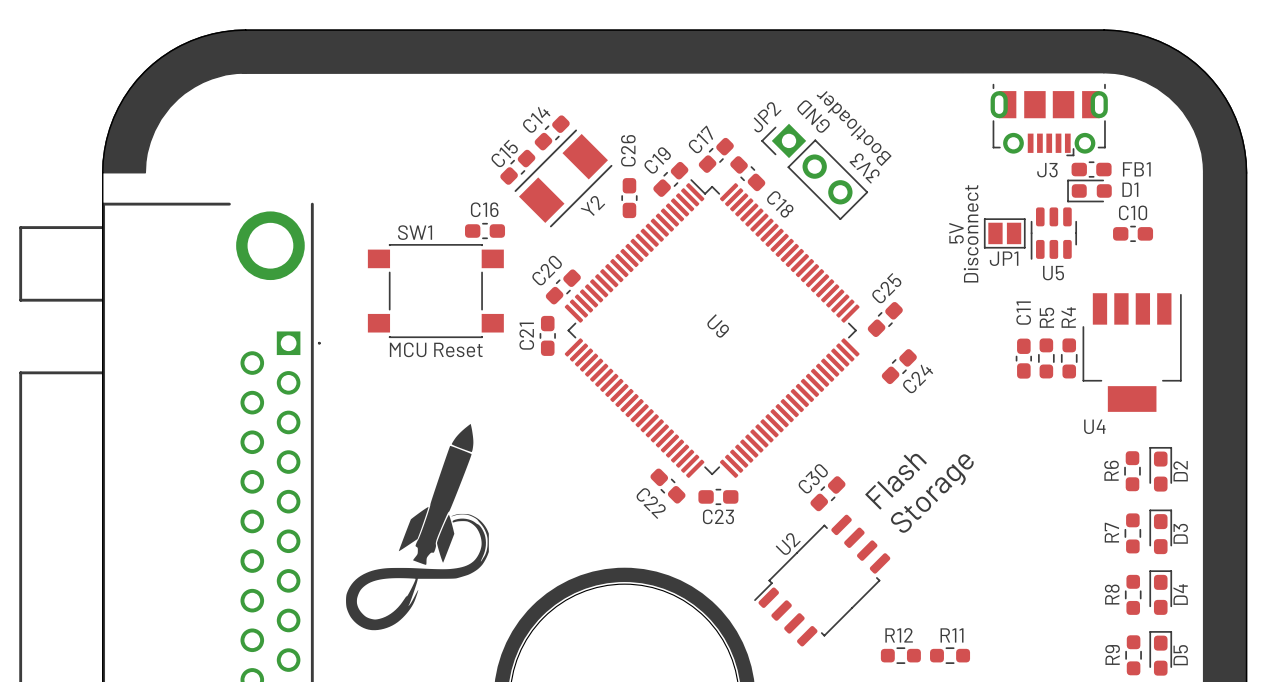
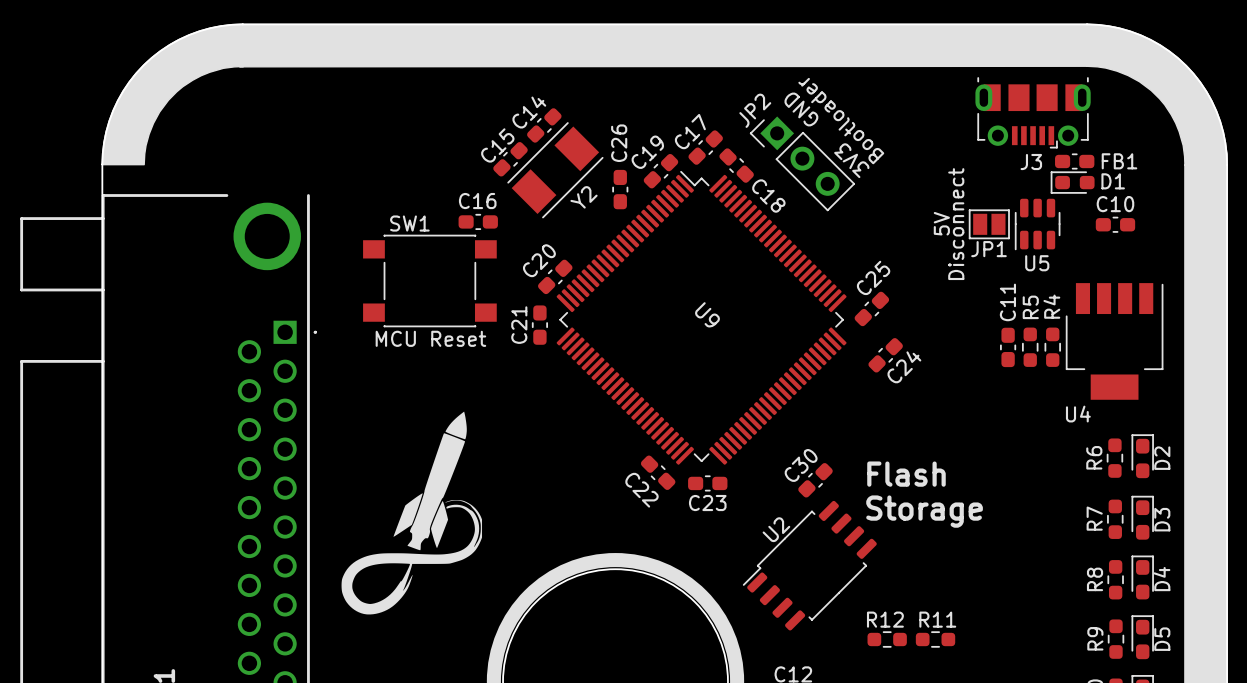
text rotation: 0° (896, 481) -> 45° clockwise (906, 474)
text rotation: 0° (932, 493) -> 45° clockwise (924, 511)

